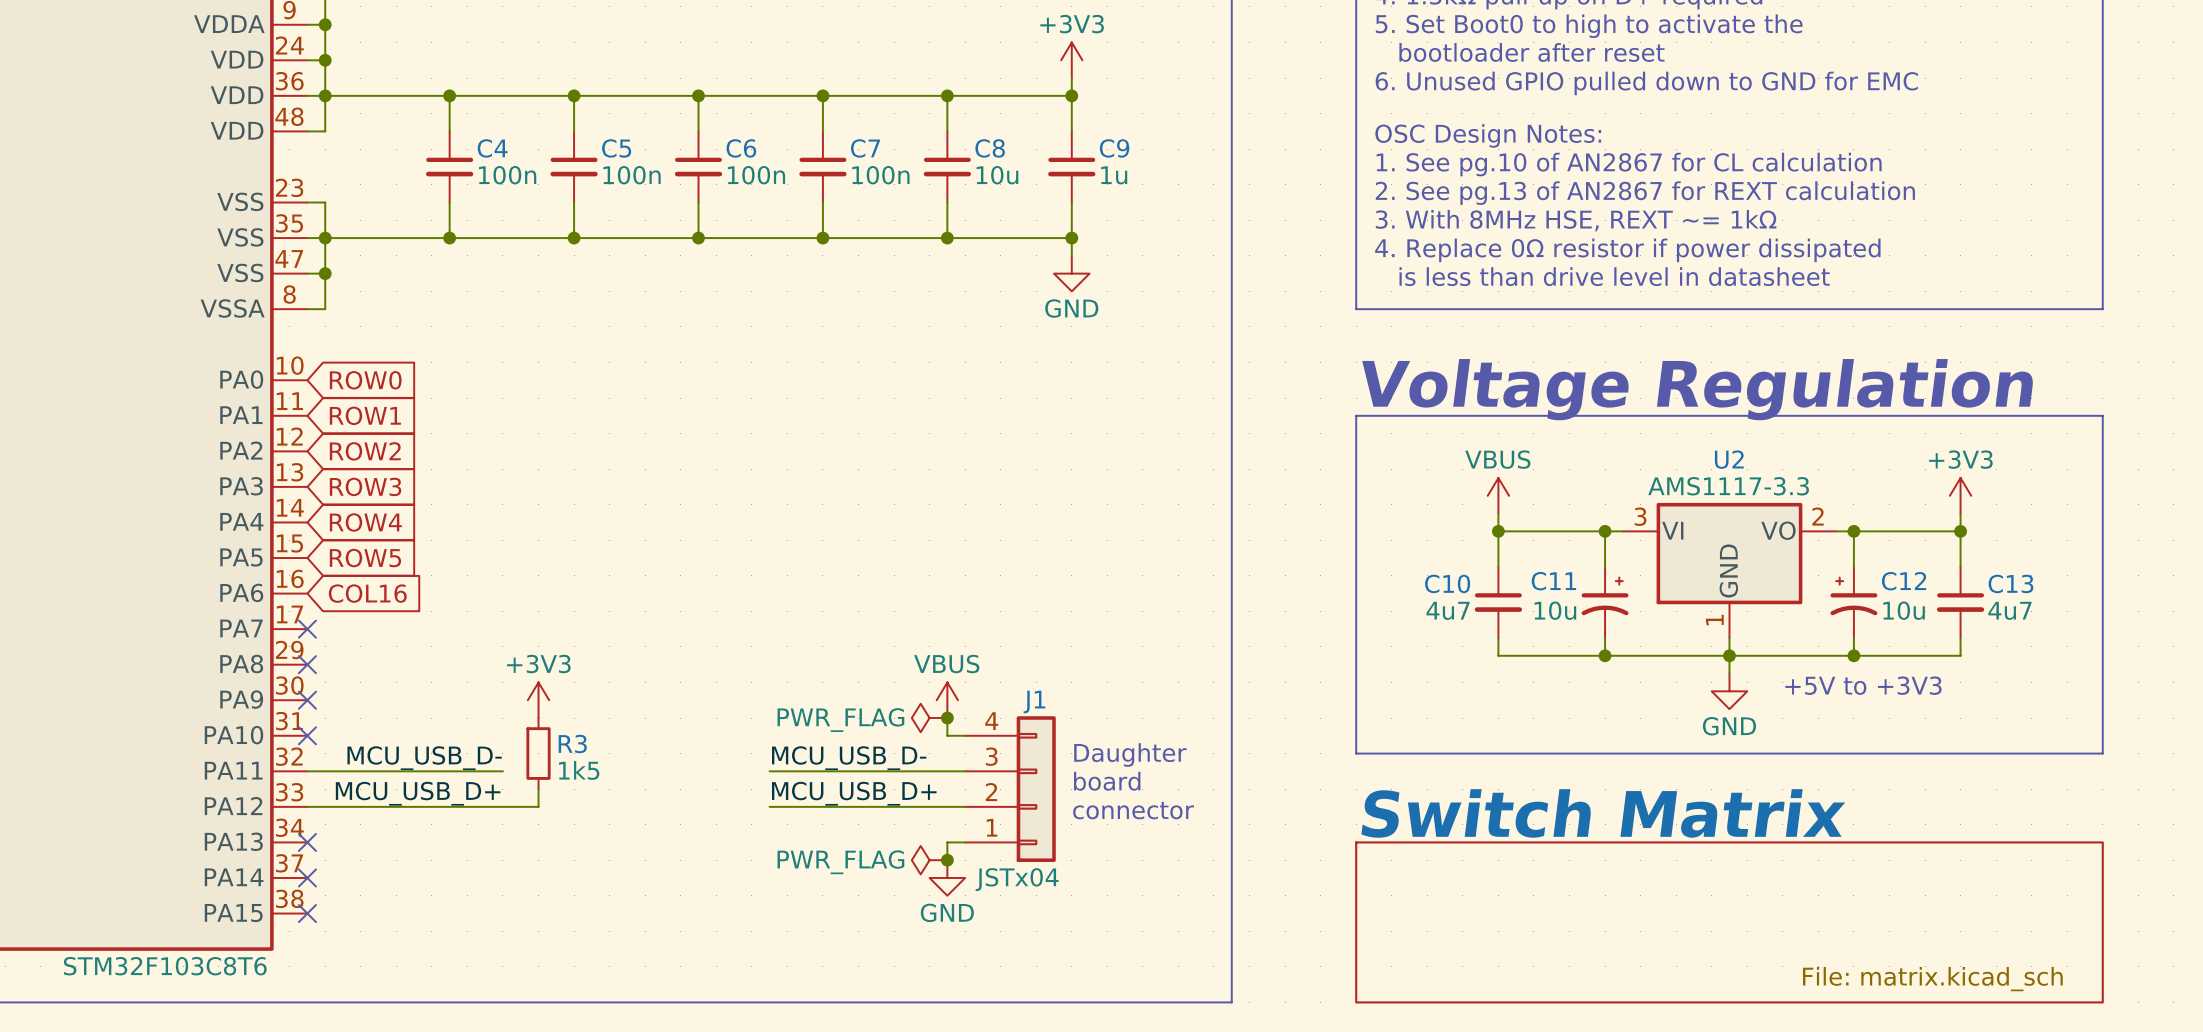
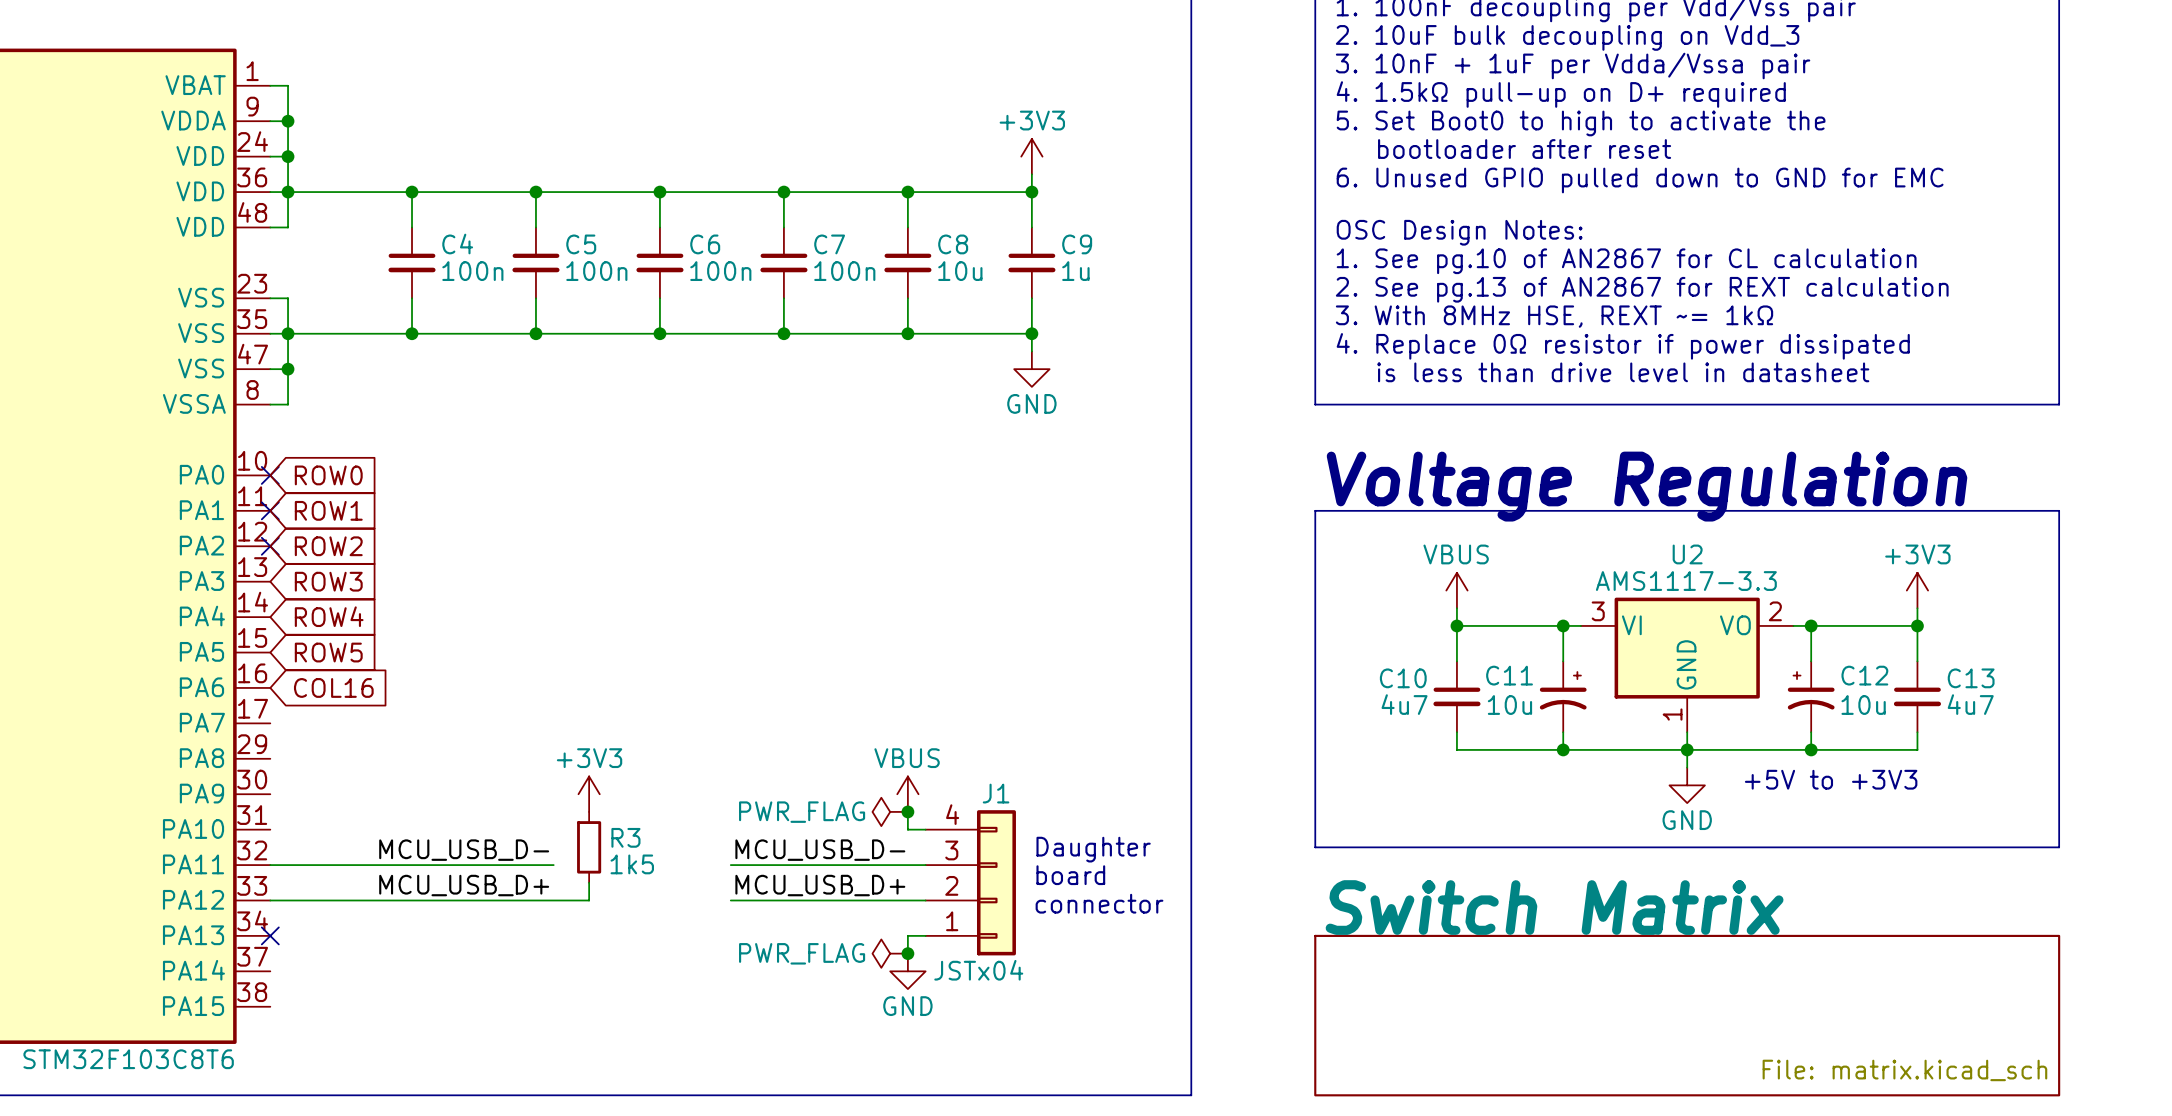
no-connect mark: none -> (270, 475)
no-connect mark: none -> (270, 510)
no-connect mark: none -> (270, 546)
no-connect mark: (307, 629) -> none
no-connect mark: (307, 664) -> none
no-connect mark: (307, 700) -> none
power symbol position: +3V3 (538, 700) -> +3V3 (589, 794)
no-connect mark: (307, 735) -> none
R3 position: (538, 753) -> (589, 847)
label position: MCU_USB_D- (424, 758) -> MCU_USB_D- (464, 850)
wire: none -> (465, 865) (553, 865)
wire: (538, 789) (538, 806) -> (589, 882) (589, 900) (500, 900)
label position: MCU_USB_D+ (418, 793) -> MCU_USB_D+ (464, 885)
no-connect mark: (307, 877) -> none
no-connect mark: (307, 913) -> none

